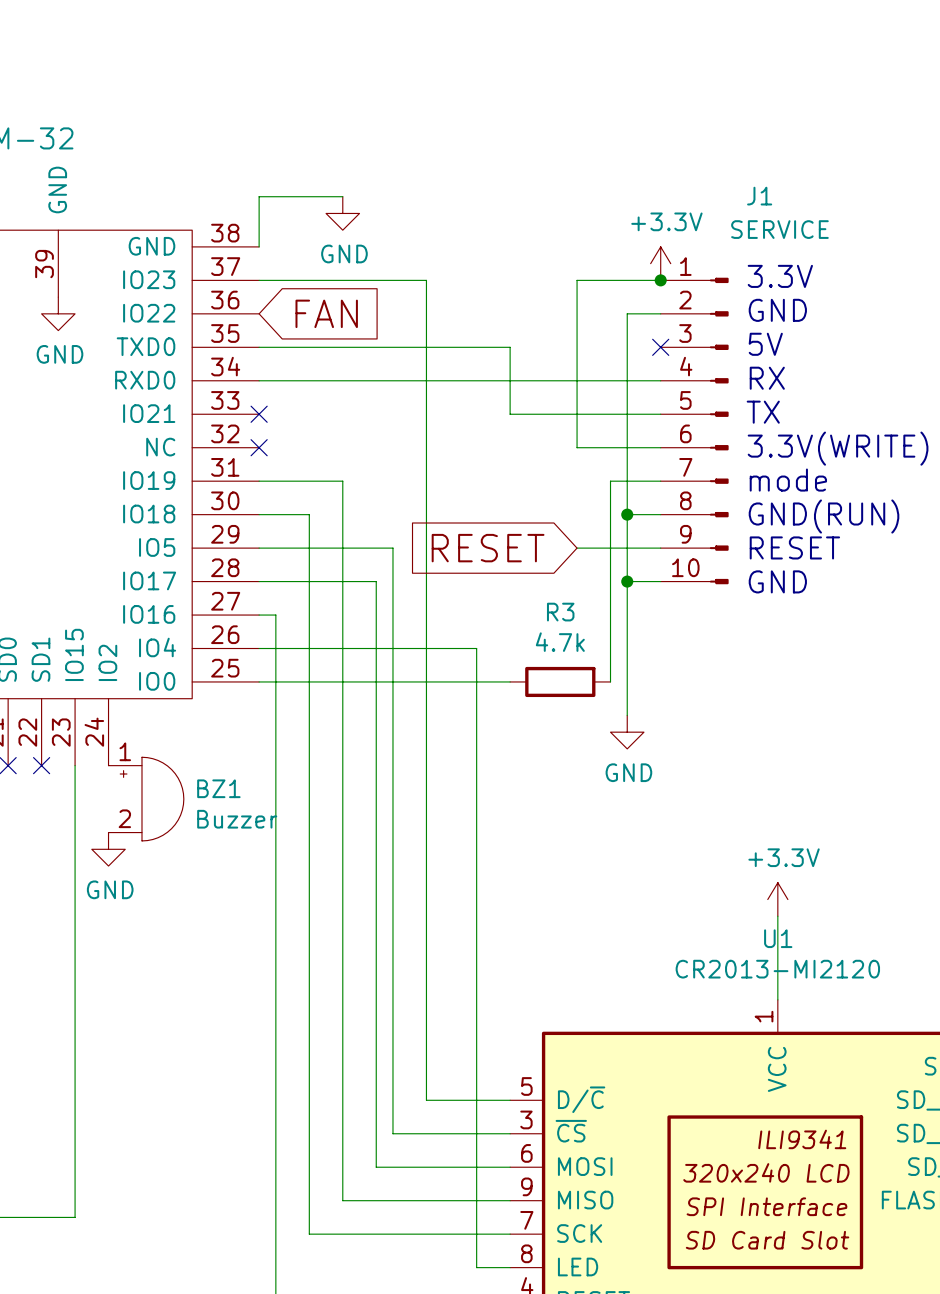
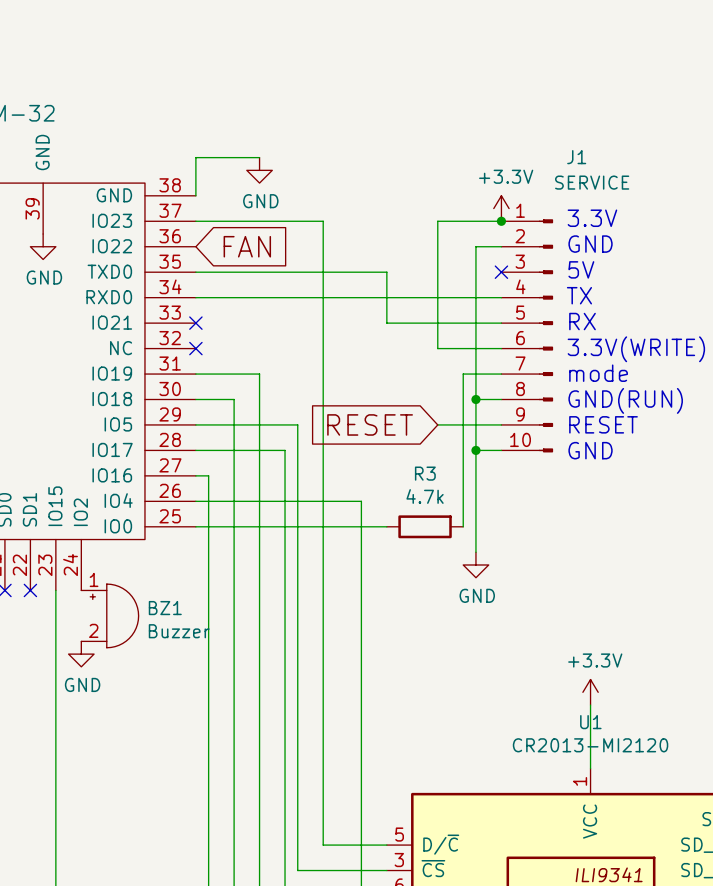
text: RX (767, 378) -> TX (579, 295)
text: TX (763, 412) -> RX (582, 321)

